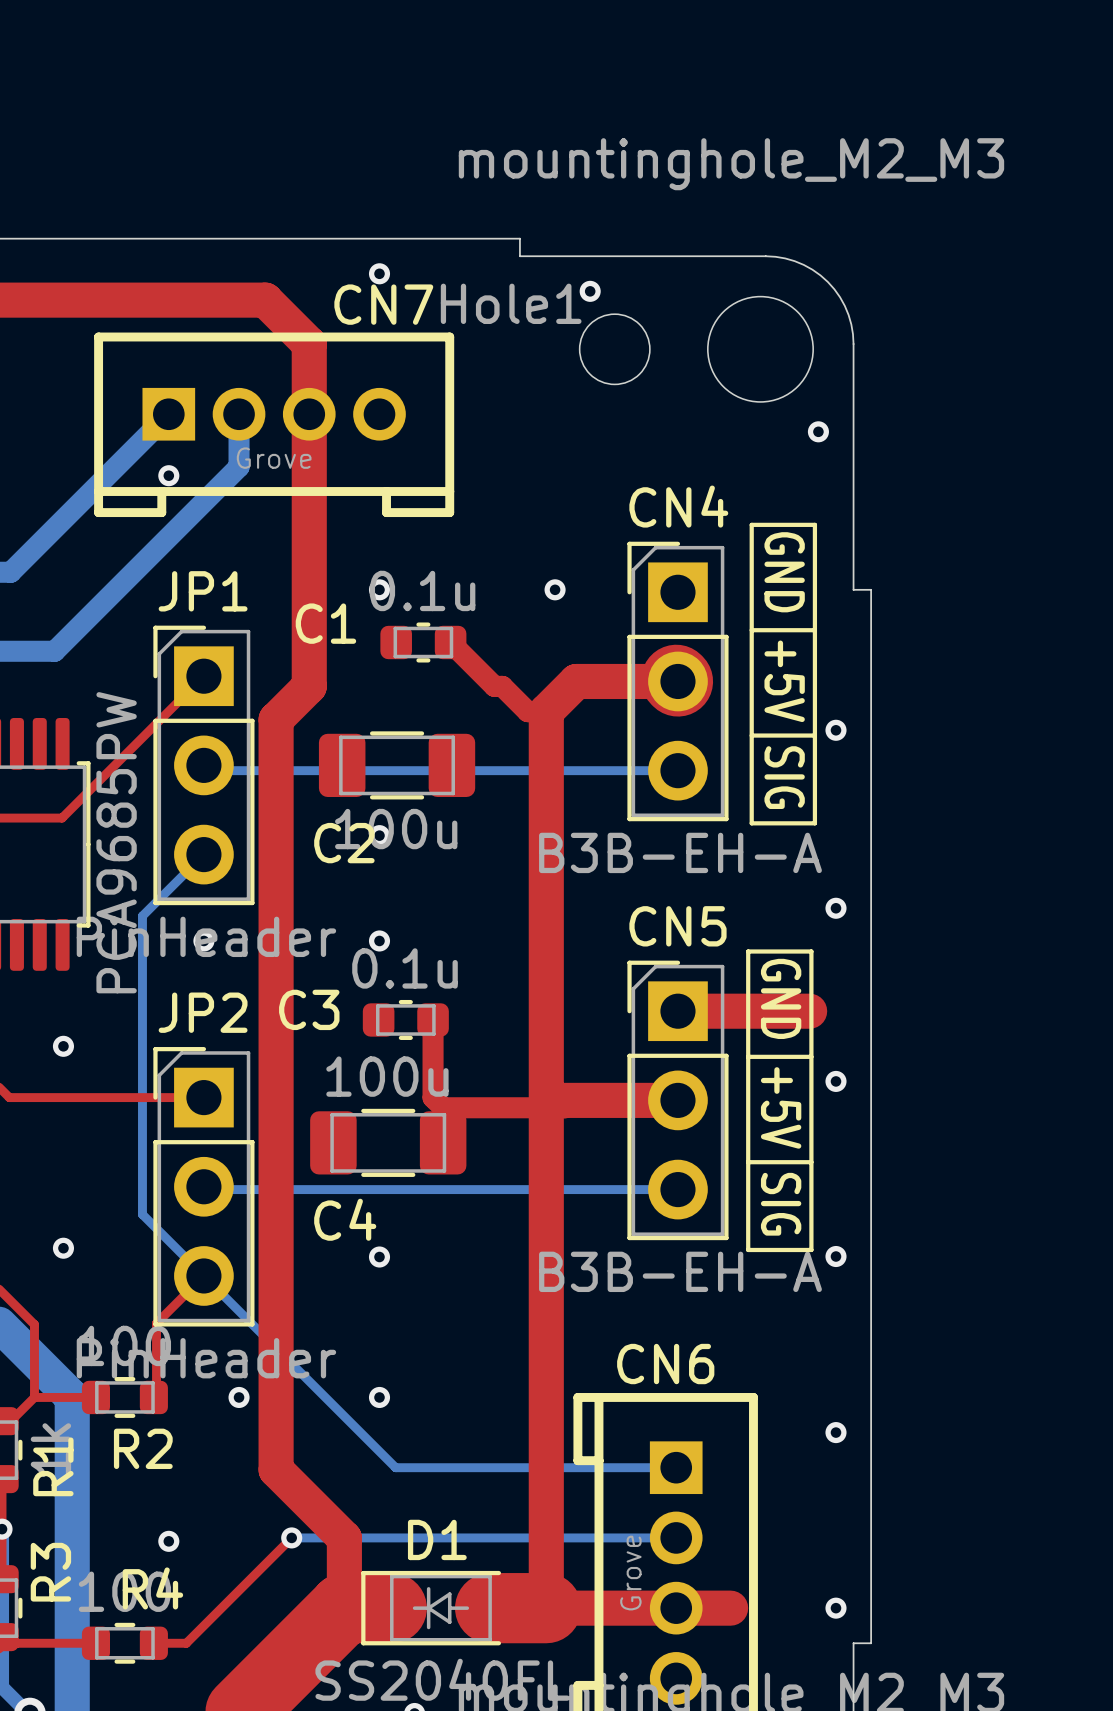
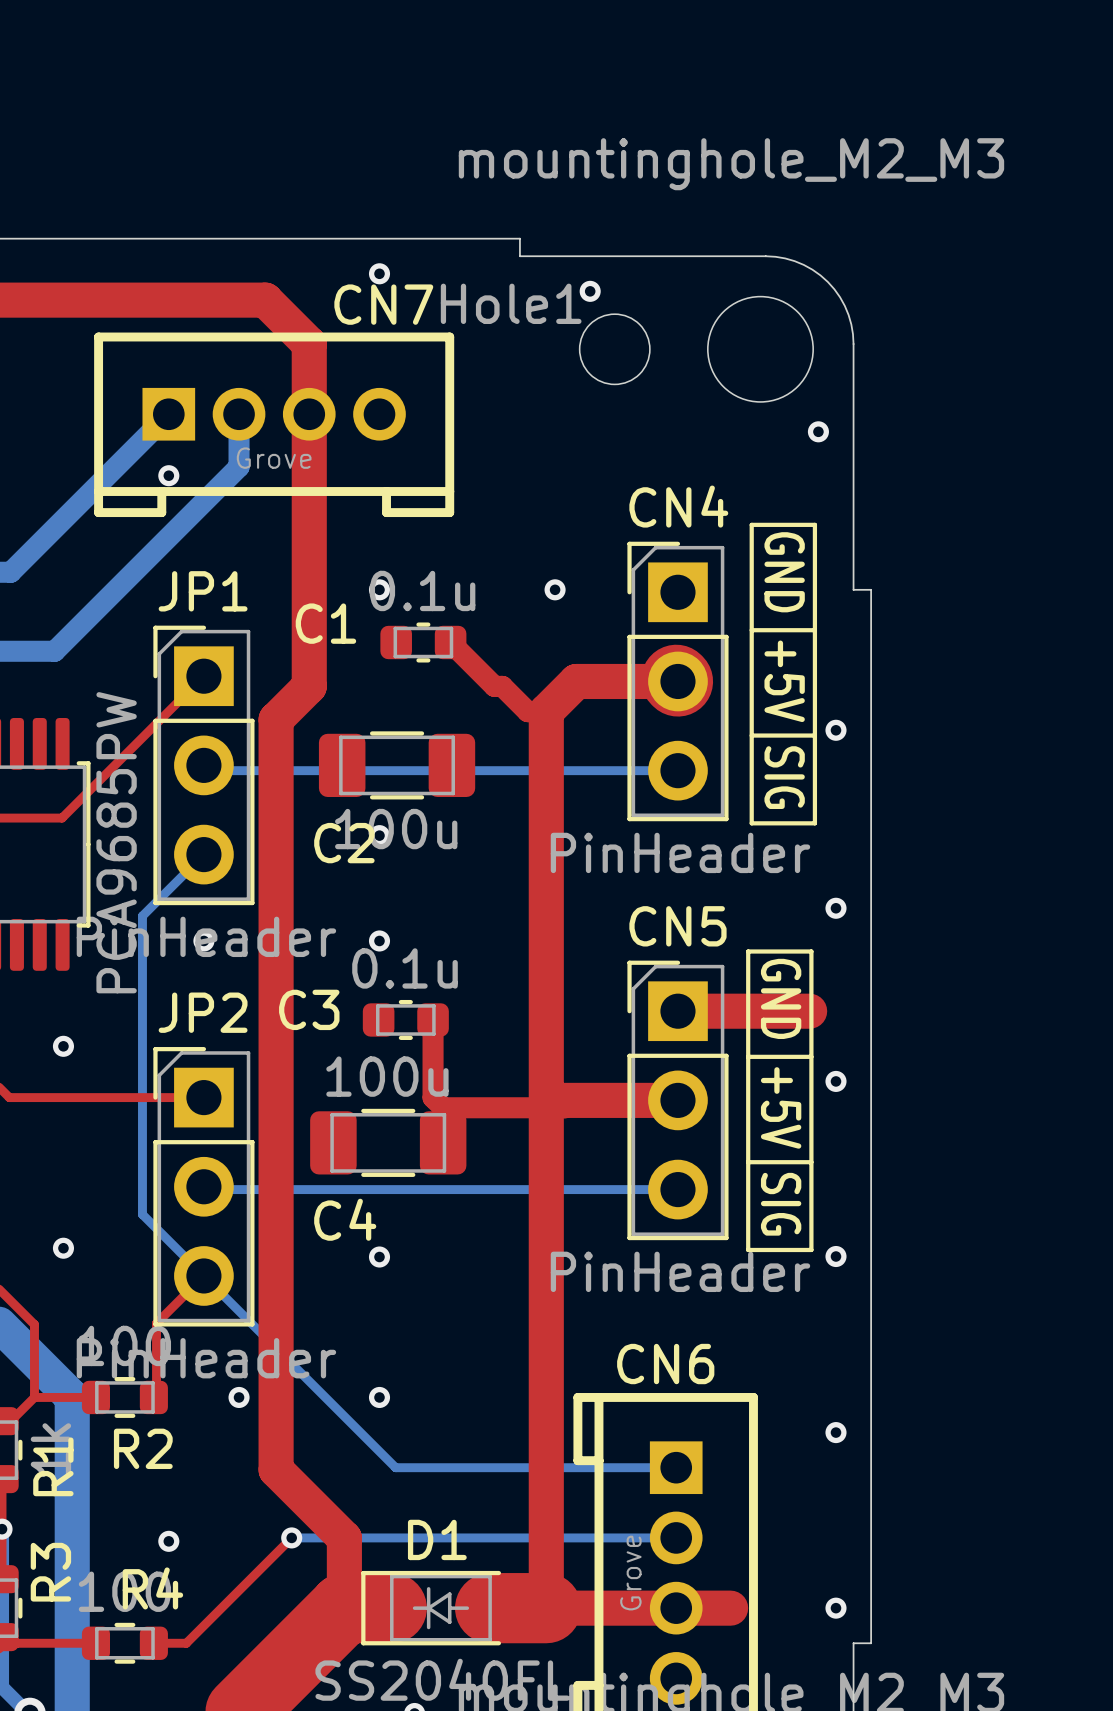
CN4 value: B3B-EH-A (680, 852) -> PinHeader (680, 852)
CN5 value: B3B-EH-A (680, 1271) -> PinHeader (680, 1271)

